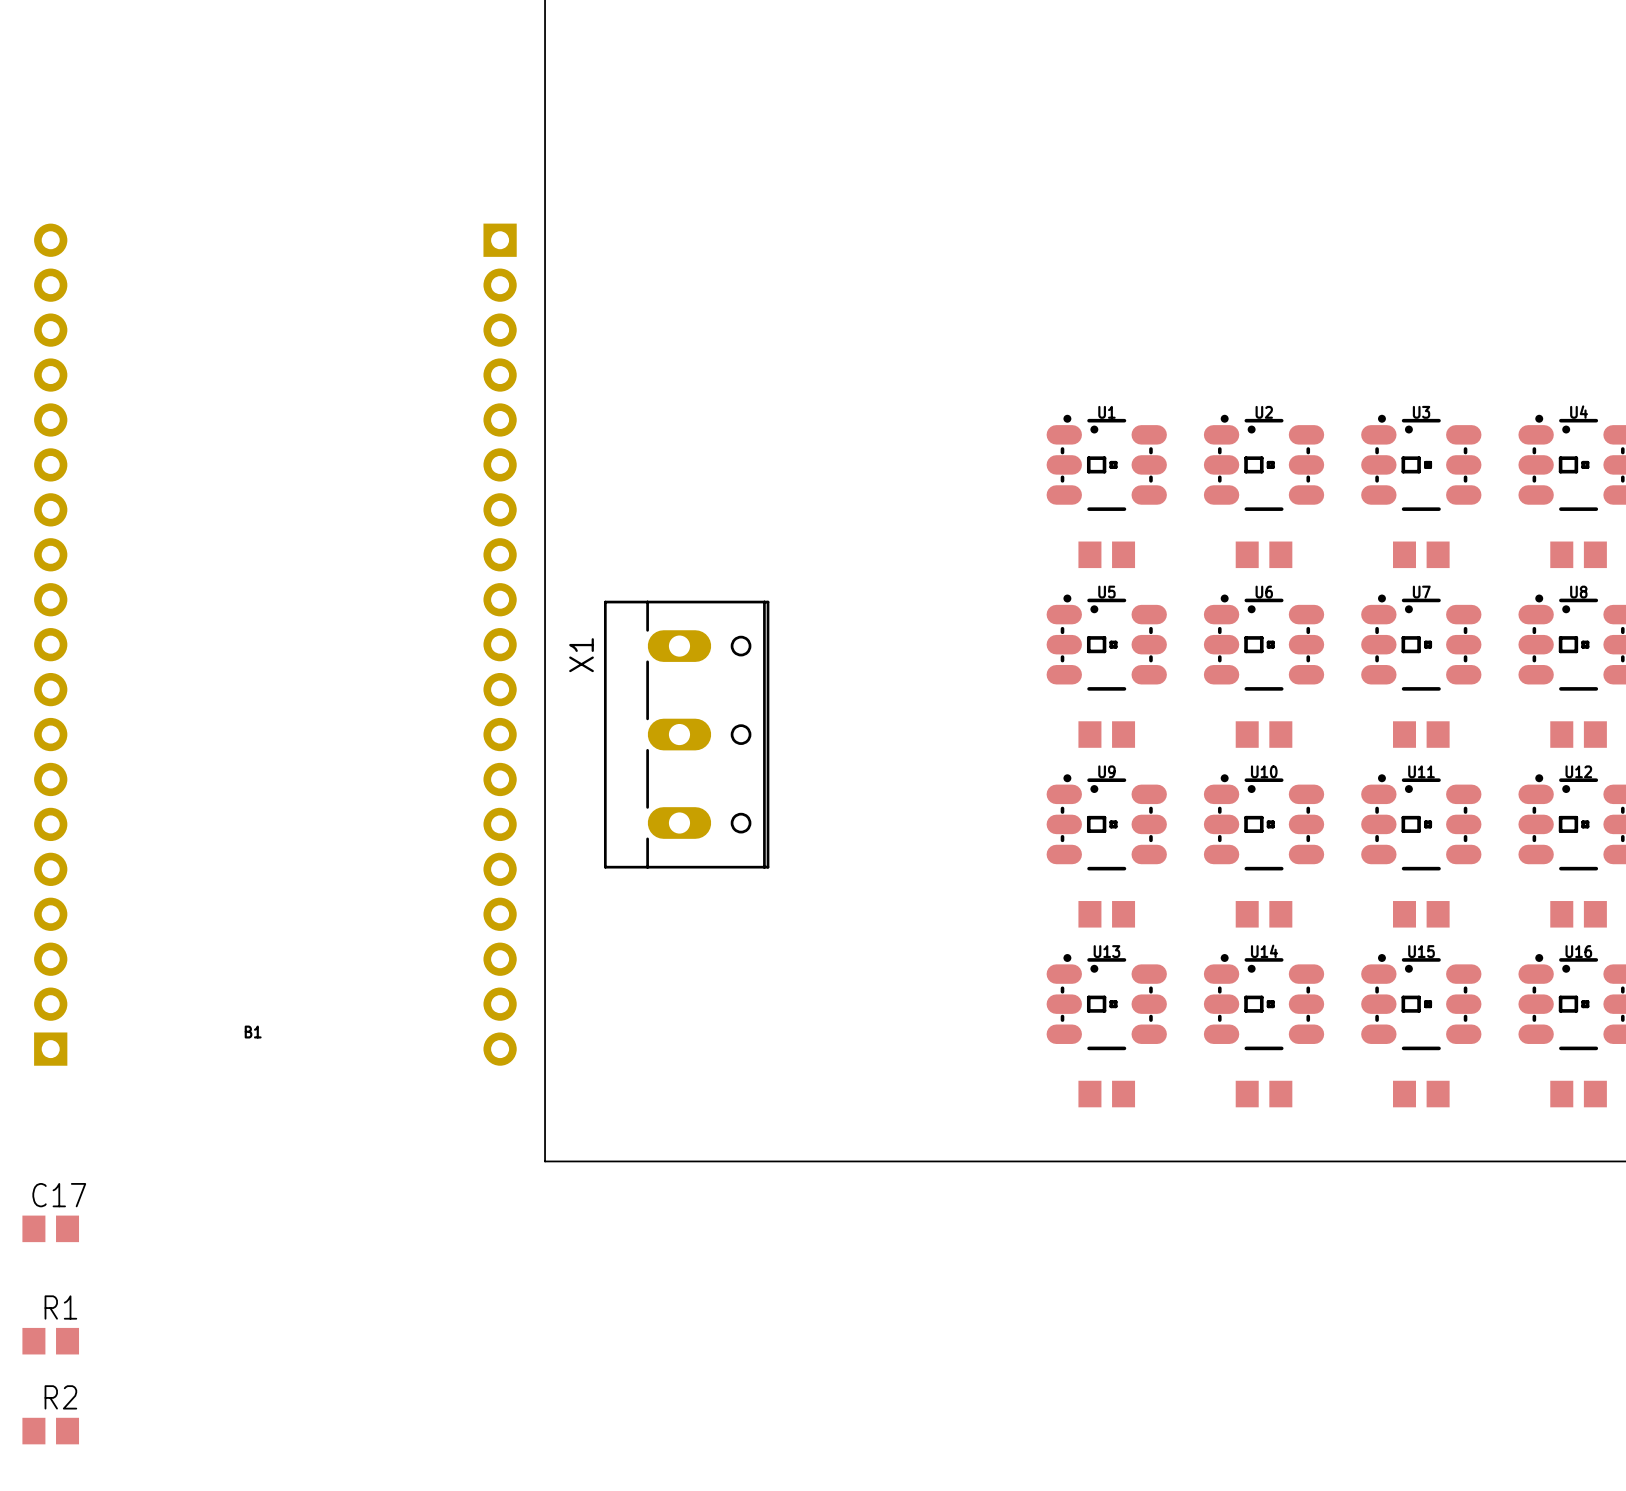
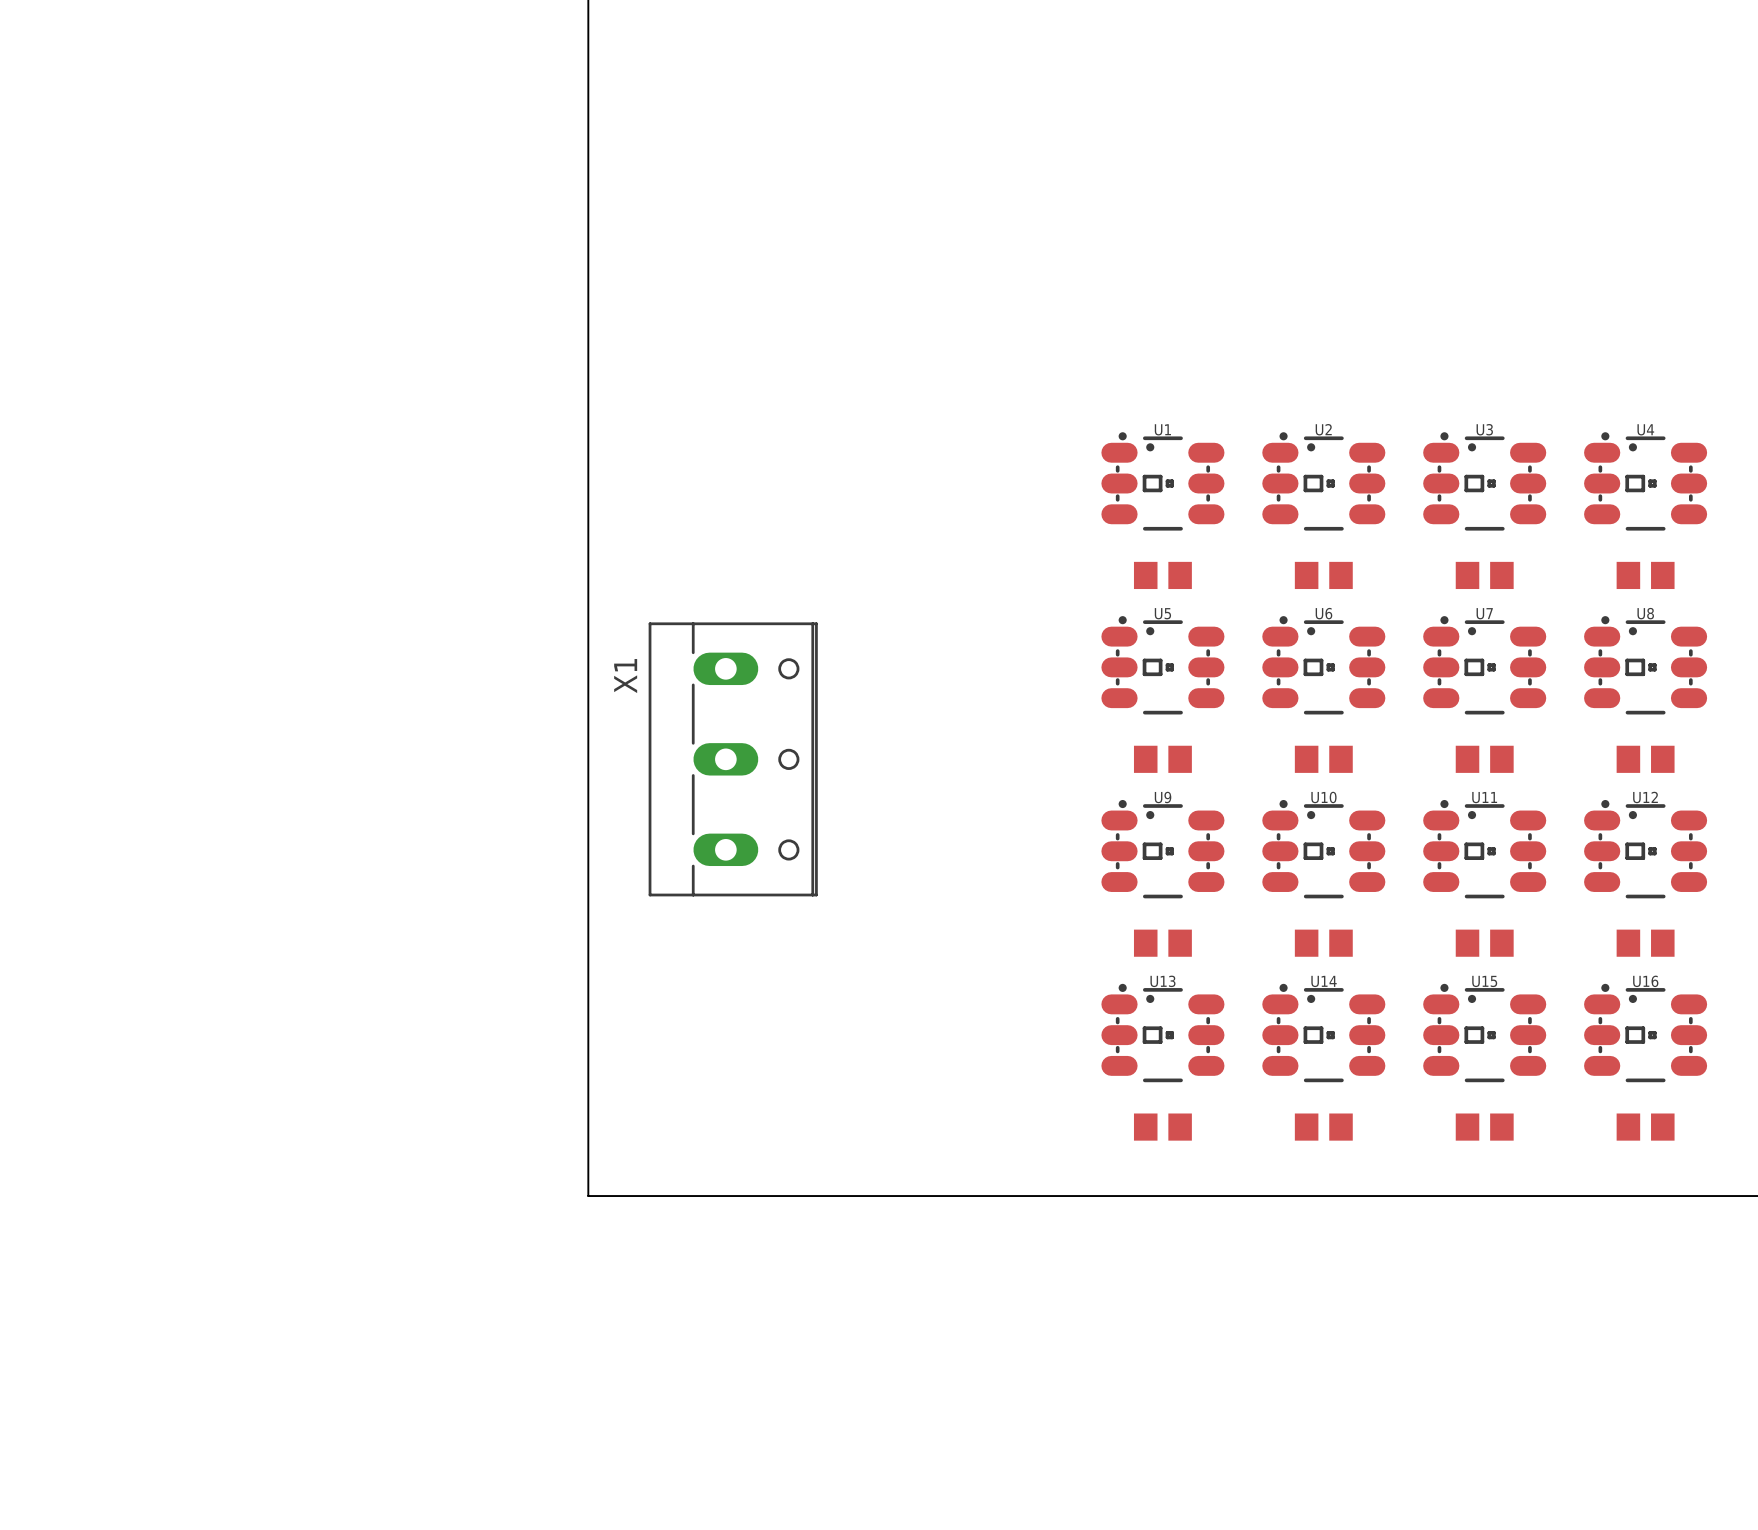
B1: (275, 644) -> none
C17: (50, 1228) -> none
R1: (50, 1341) -> none
R2: (50, 1431) -> none

